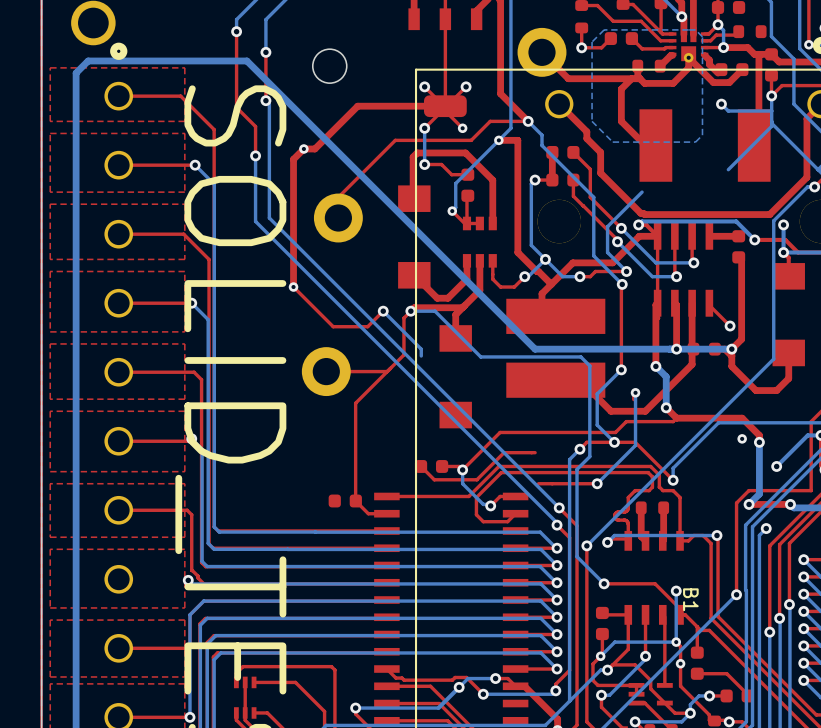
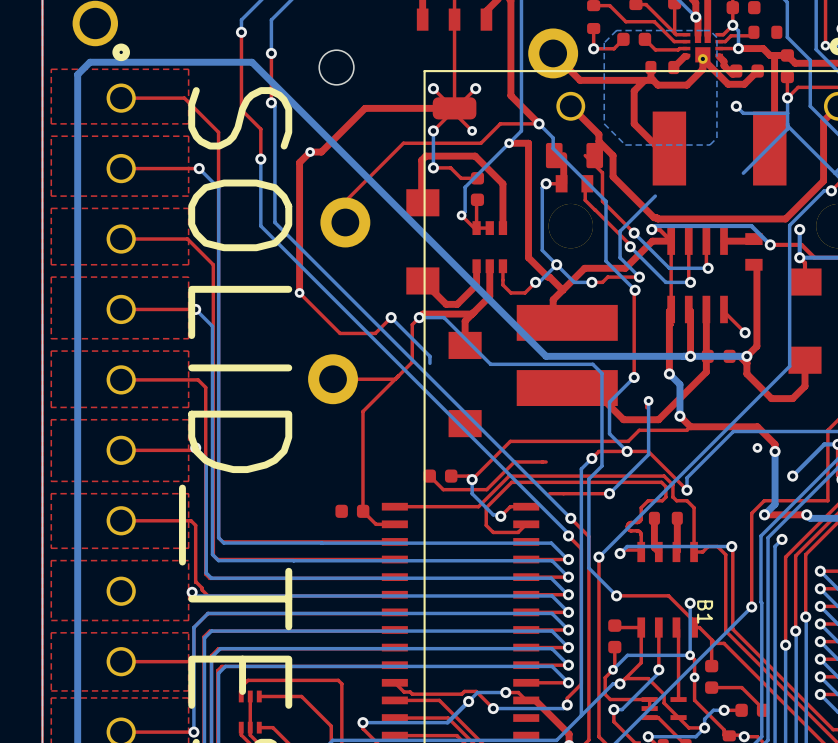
part footprint: [546, 145, 580, 159] -> [545, 142, 604, 169]
part footprint: [546, 173, 580, 187] -> [555, 175, 594, 193]
part footprint: [732, 230, 746, 264] -> [745, 233, 763, 271]

